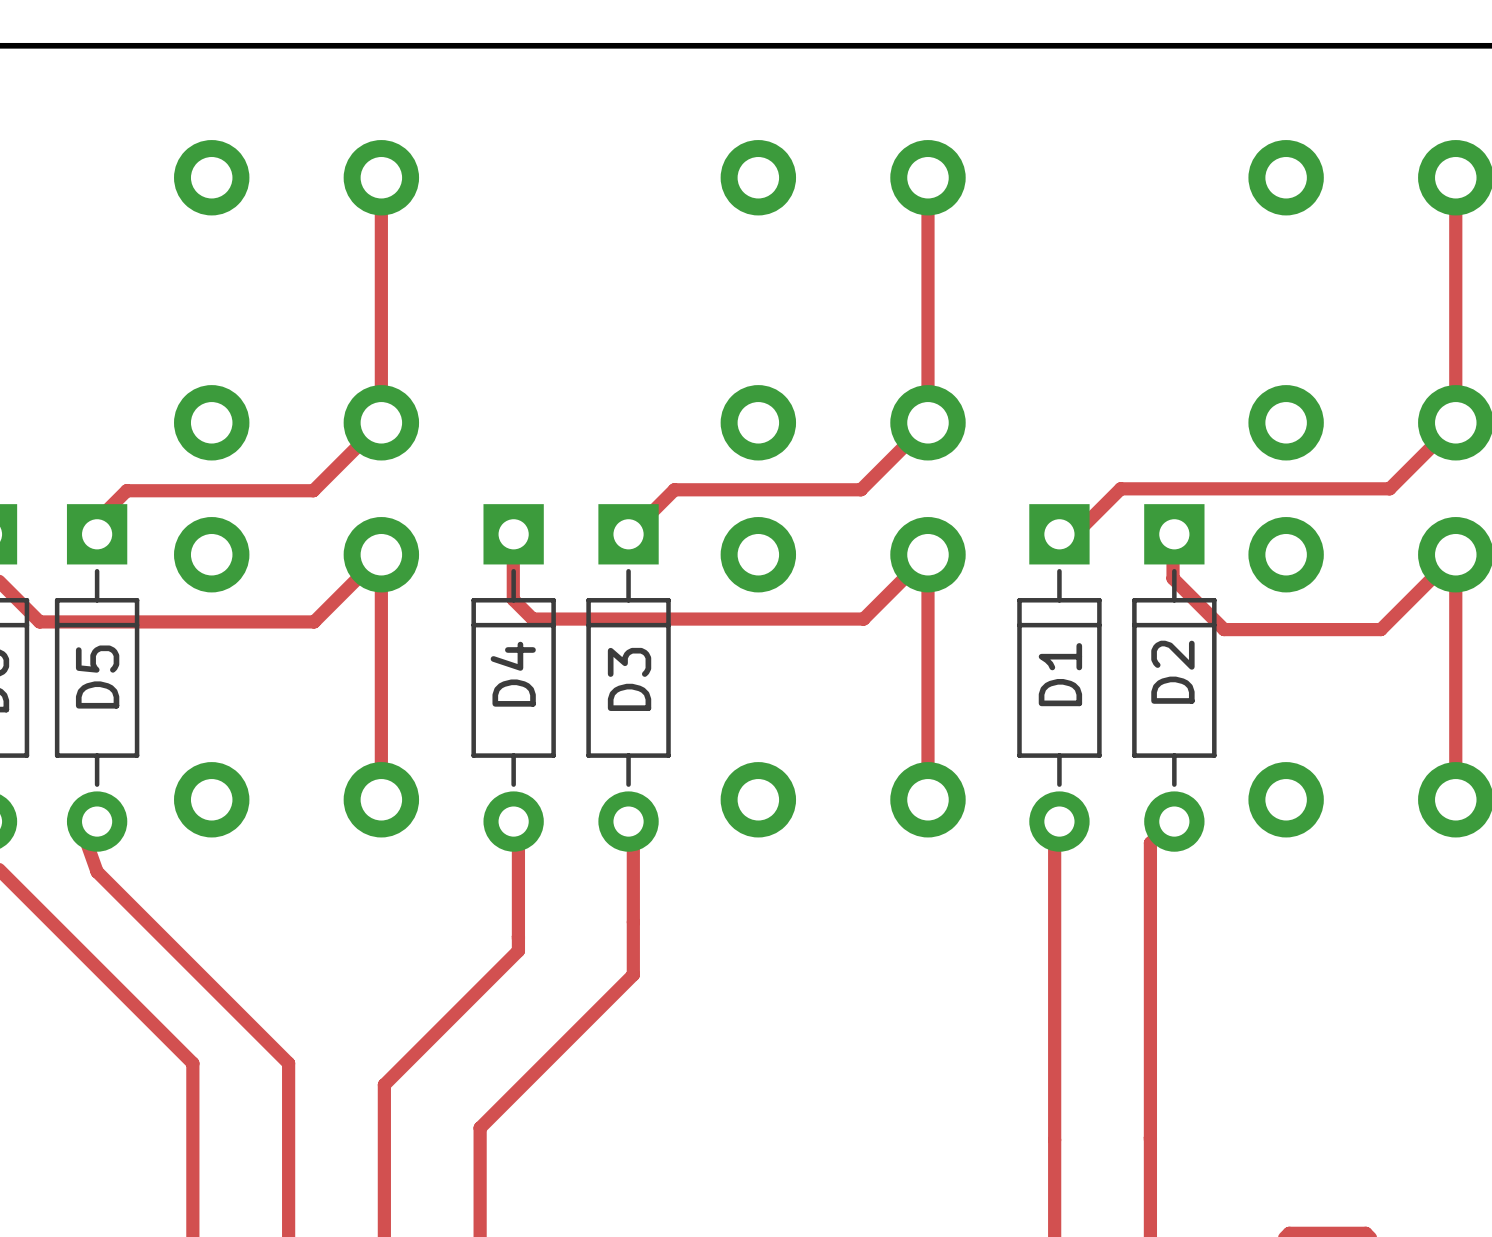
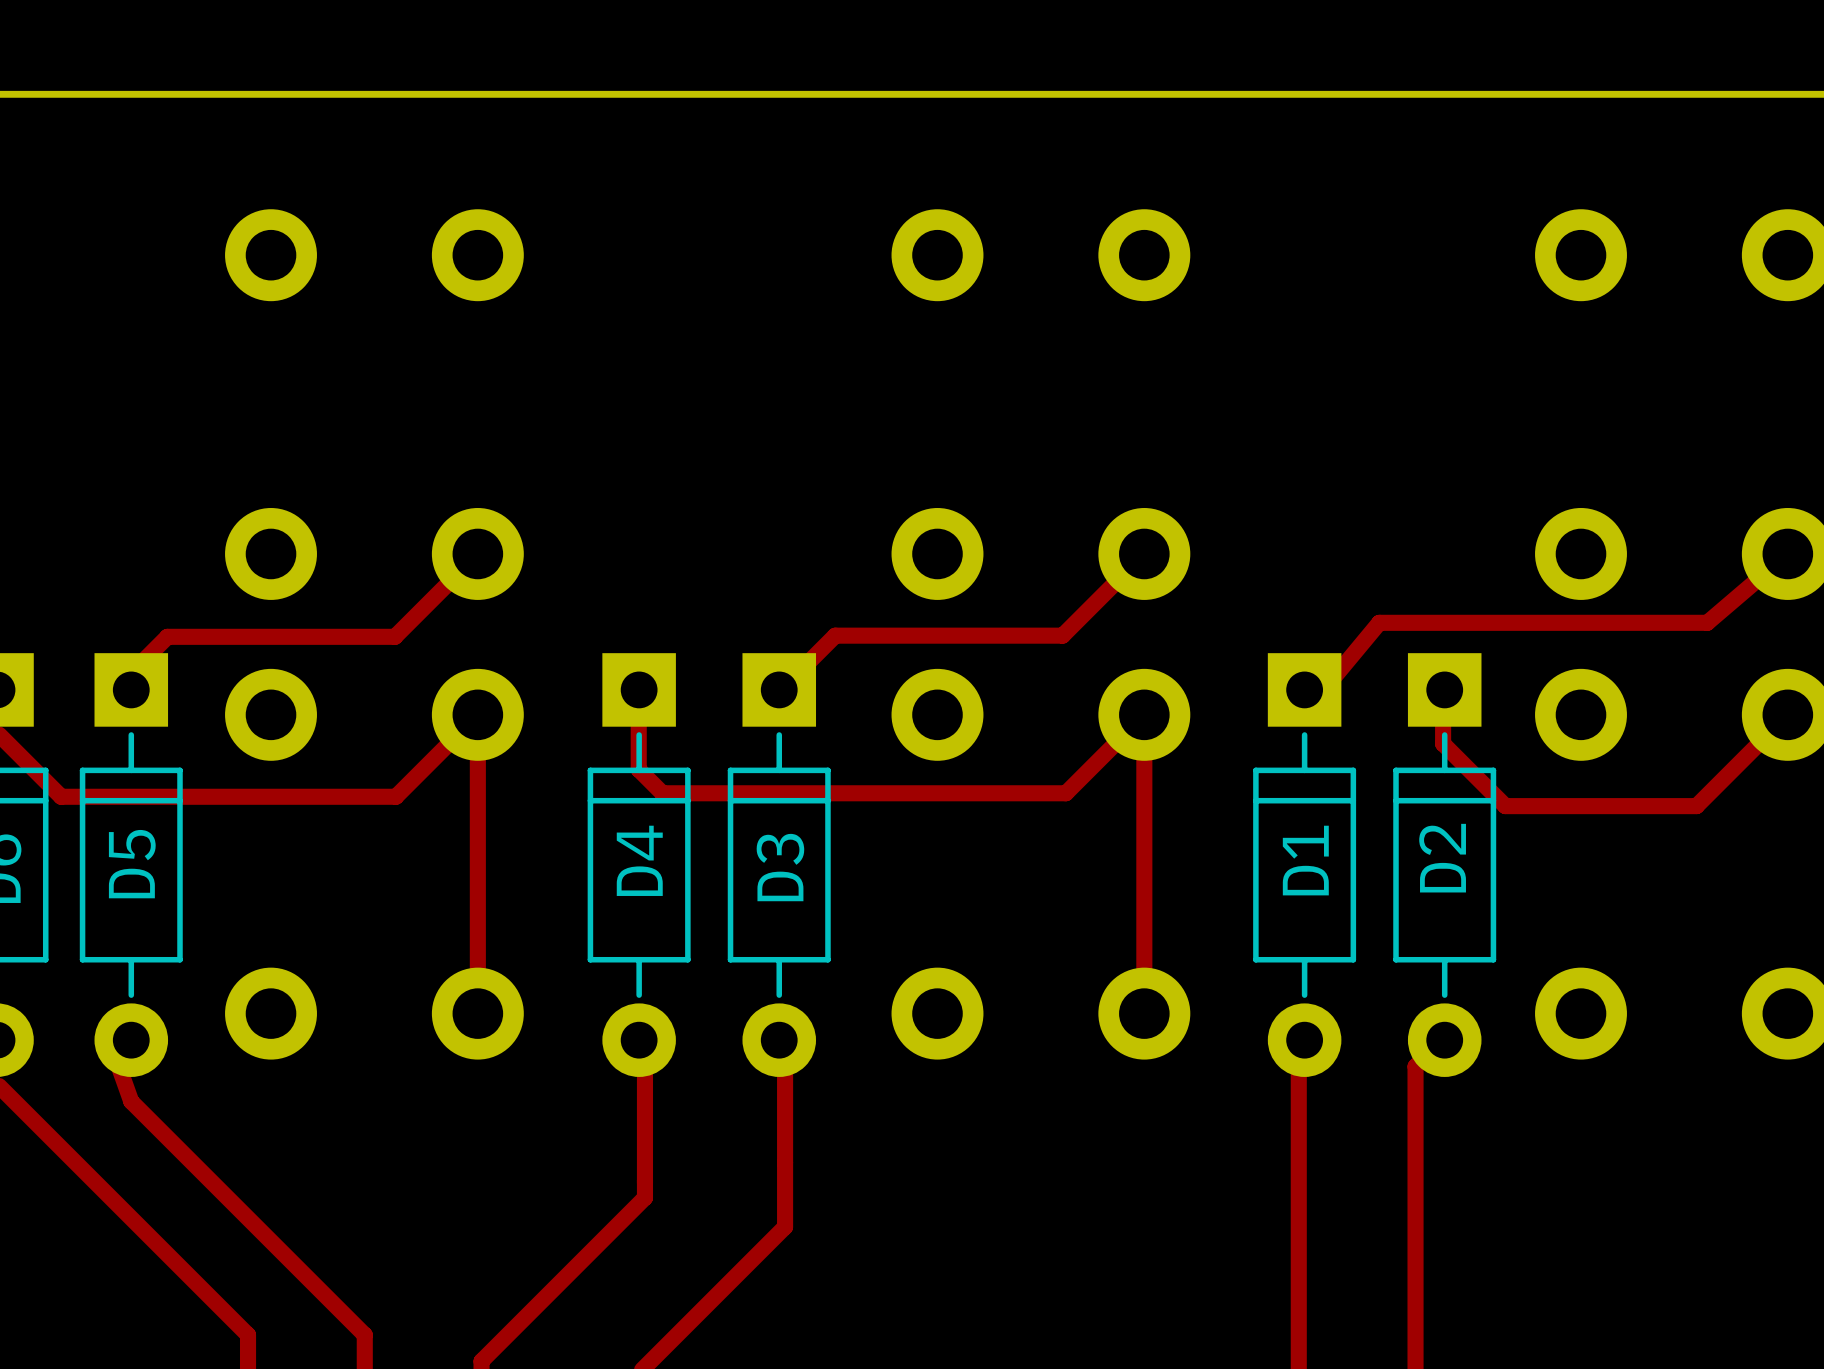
track: (381, 177) (381, 422) -> none
track: (927, 177) (927, 422) -> none
track: (1455, 177) (1455, 422) (1389, 488) (1120, 488) (1073, 535) -> (1787, 553) (1707, 622) (1379, 622) (1321, 691)
track: (1455, 554) (1455, 799) -> none

